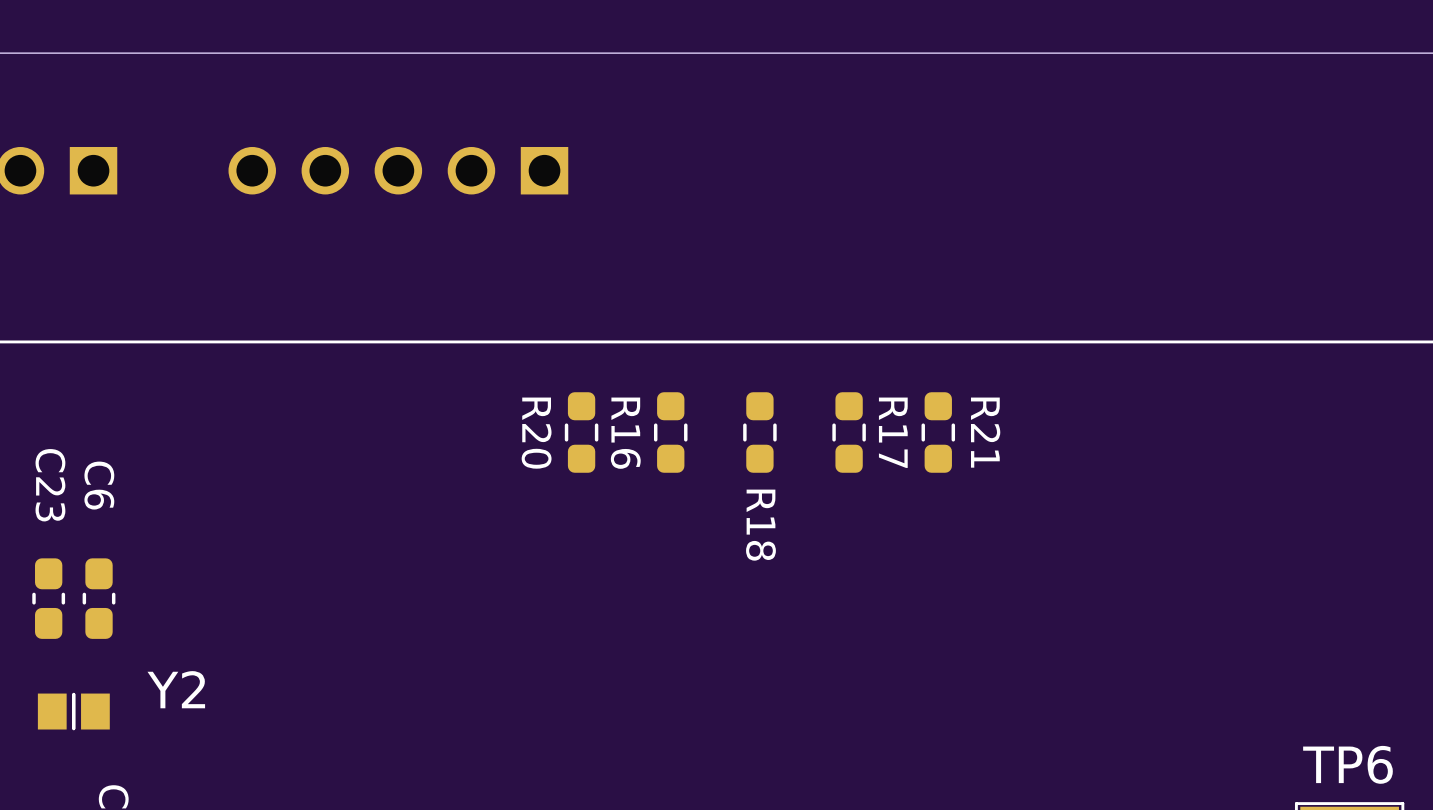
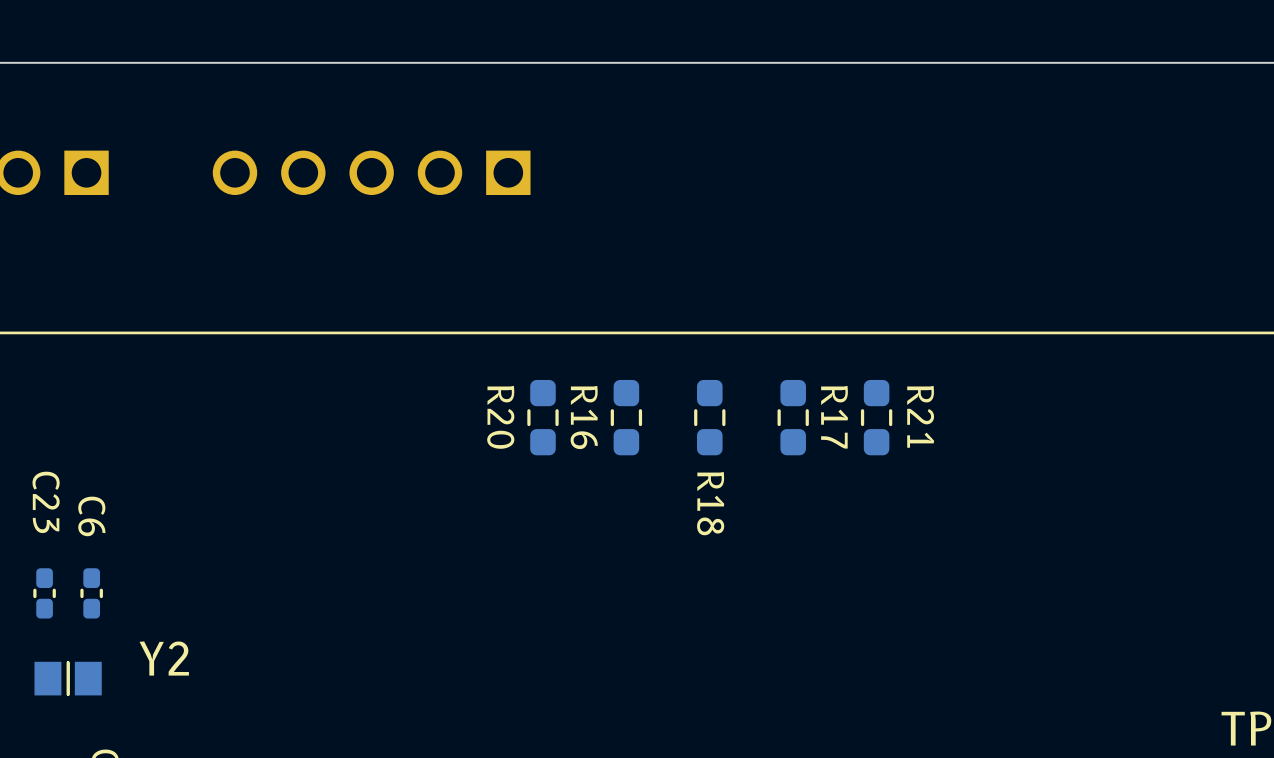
C23 footprint: [32, 558, 66, 639] -> [33, 568, 56, 619]
C6 footprint: [82, 558, 116, 639] -> [80, 568, 103, 619]

